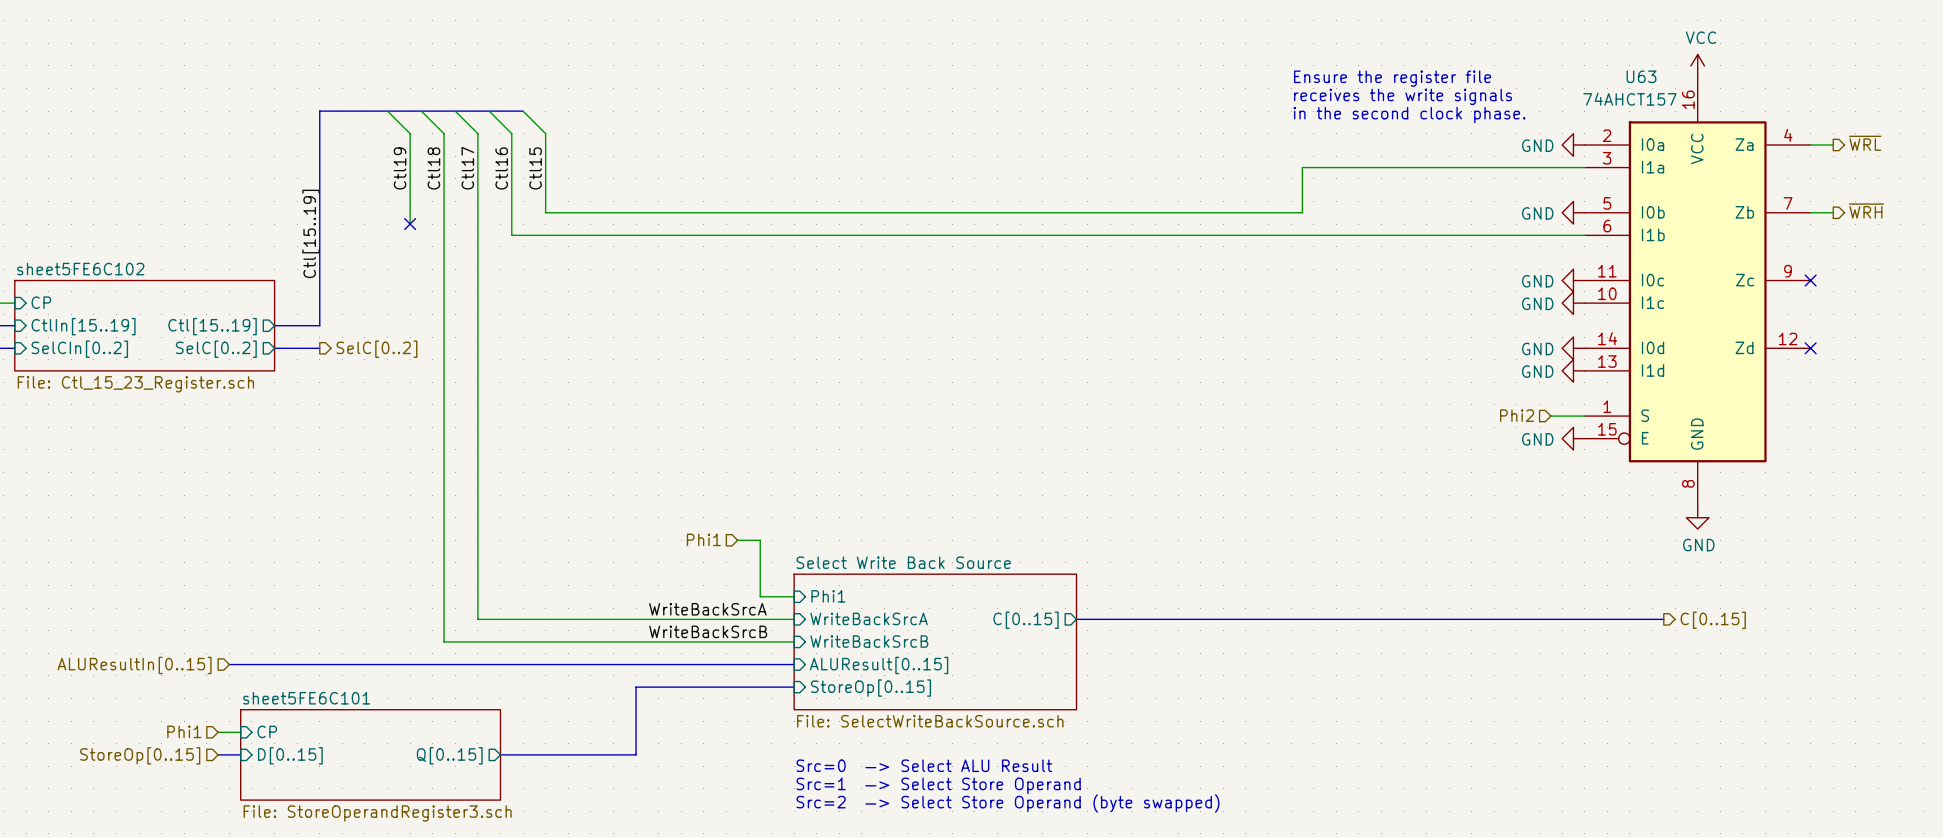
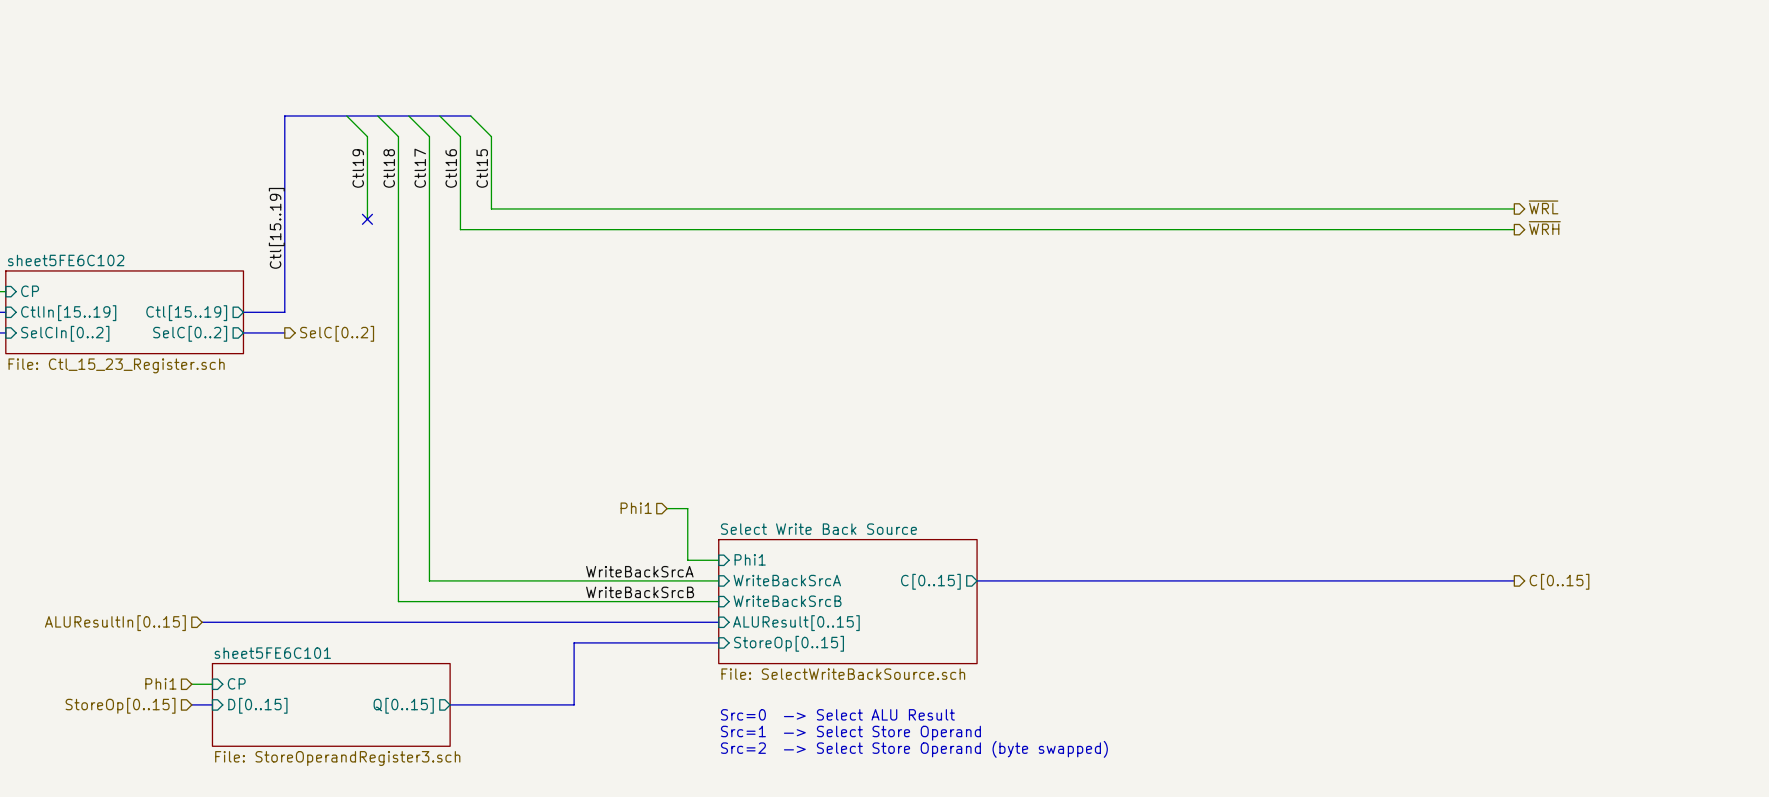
power symbol: VCC (1697, 65) -> none
text: Ensure the register file (1392, 78) -> none
text: receives the write signals (1403, 96) -> none
text: in the second clock phase. (1409, 115) -> none
hierarchical label position: ~{WRL} (1865, 143) -> ~{WRL} (1543, 207)
power symbol: GND (1573, 144) -> none
wire: (1810, 144) (1833, 144) -> none
wire: (1584, 167) (1302, 167) (1302, 212) -> (1514, 208) (1183, 208)
hierarchical label position: ~{WRH} (1866, 211) -> ~{WRH} (1544, 228)
power symbol: GND (1573, 212) -> none
wire: (1810, 212) (1833, 212) -> none
power symbol: GND (1573, 280) -> none
no-connect mark: (1810, 280) -> none
U63: 74AHCT157 (1697, 291) -> none
power symbol: GND (1573, 303) -> none
power symbol: GND (1573, 348) -> none
no-connect mark: (1810, 348) -> none
power symbol: GND (1573, 370) -> none
hierarchical label: Phi2 (1517, 415) -> none
wire: (1550, 416) (1584, 416) -> none
power symbol: GND (1573, 438) -> none
power symbol: GND (1697, 517) -> none

